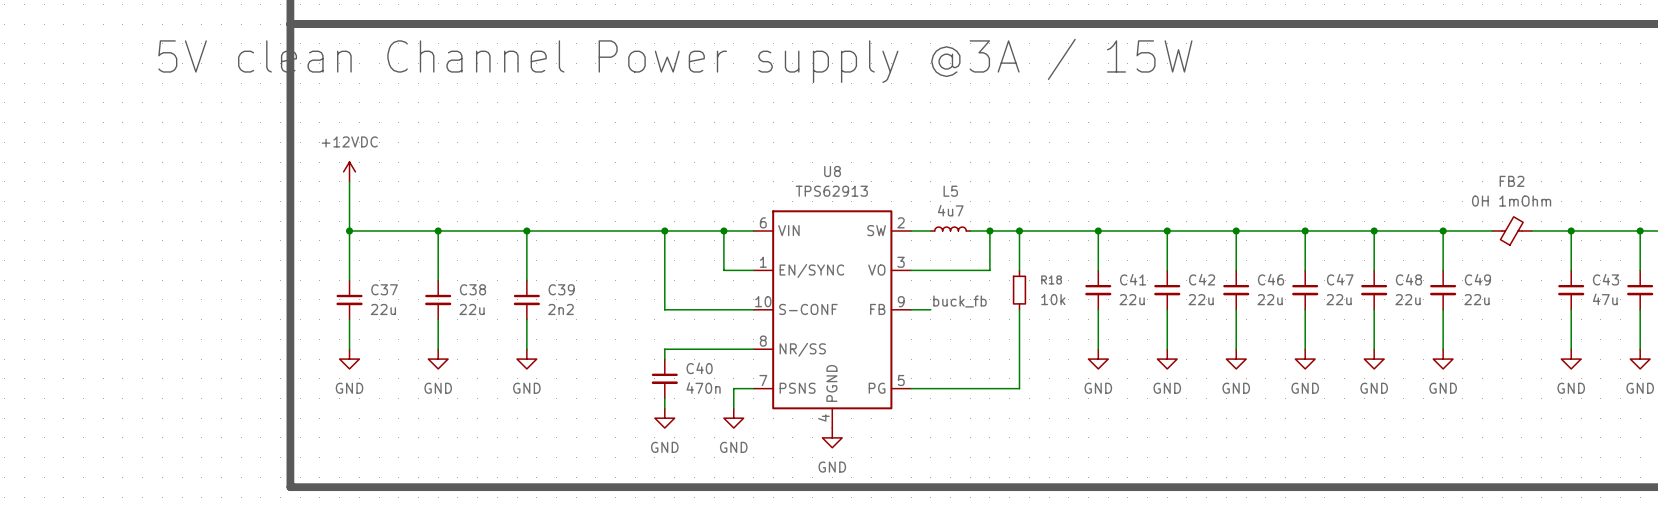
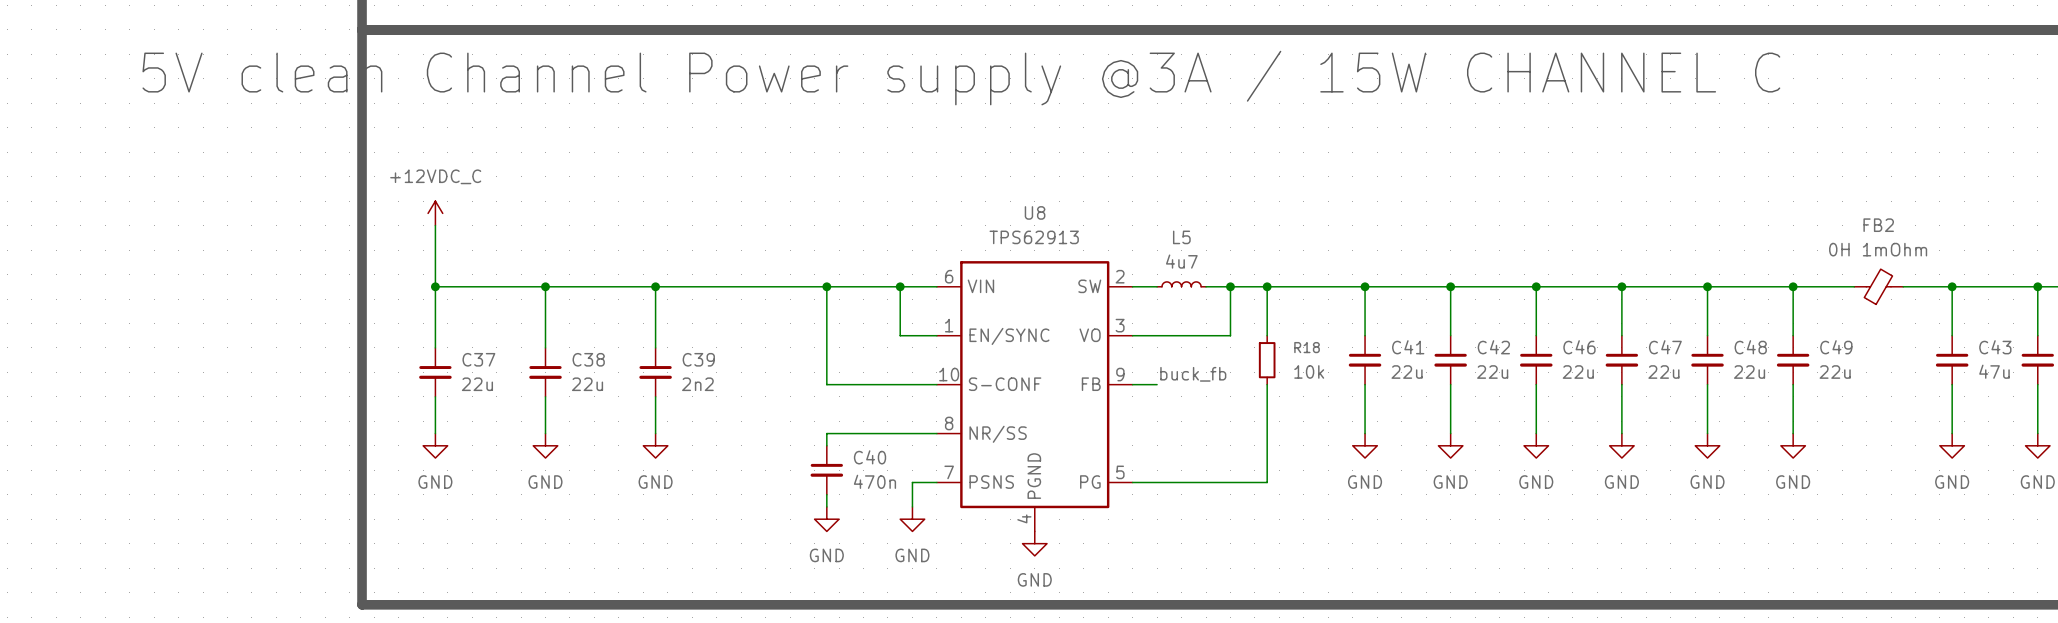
text: 5V clean Channel Power supply @3A / 15W (675, 60) -> 5V clean Channel Power supply @3A / 15W CHANNEL C (961, 78)
power symbol: +12VDC (349, 171) -> +12VDC_C (435, 213)

